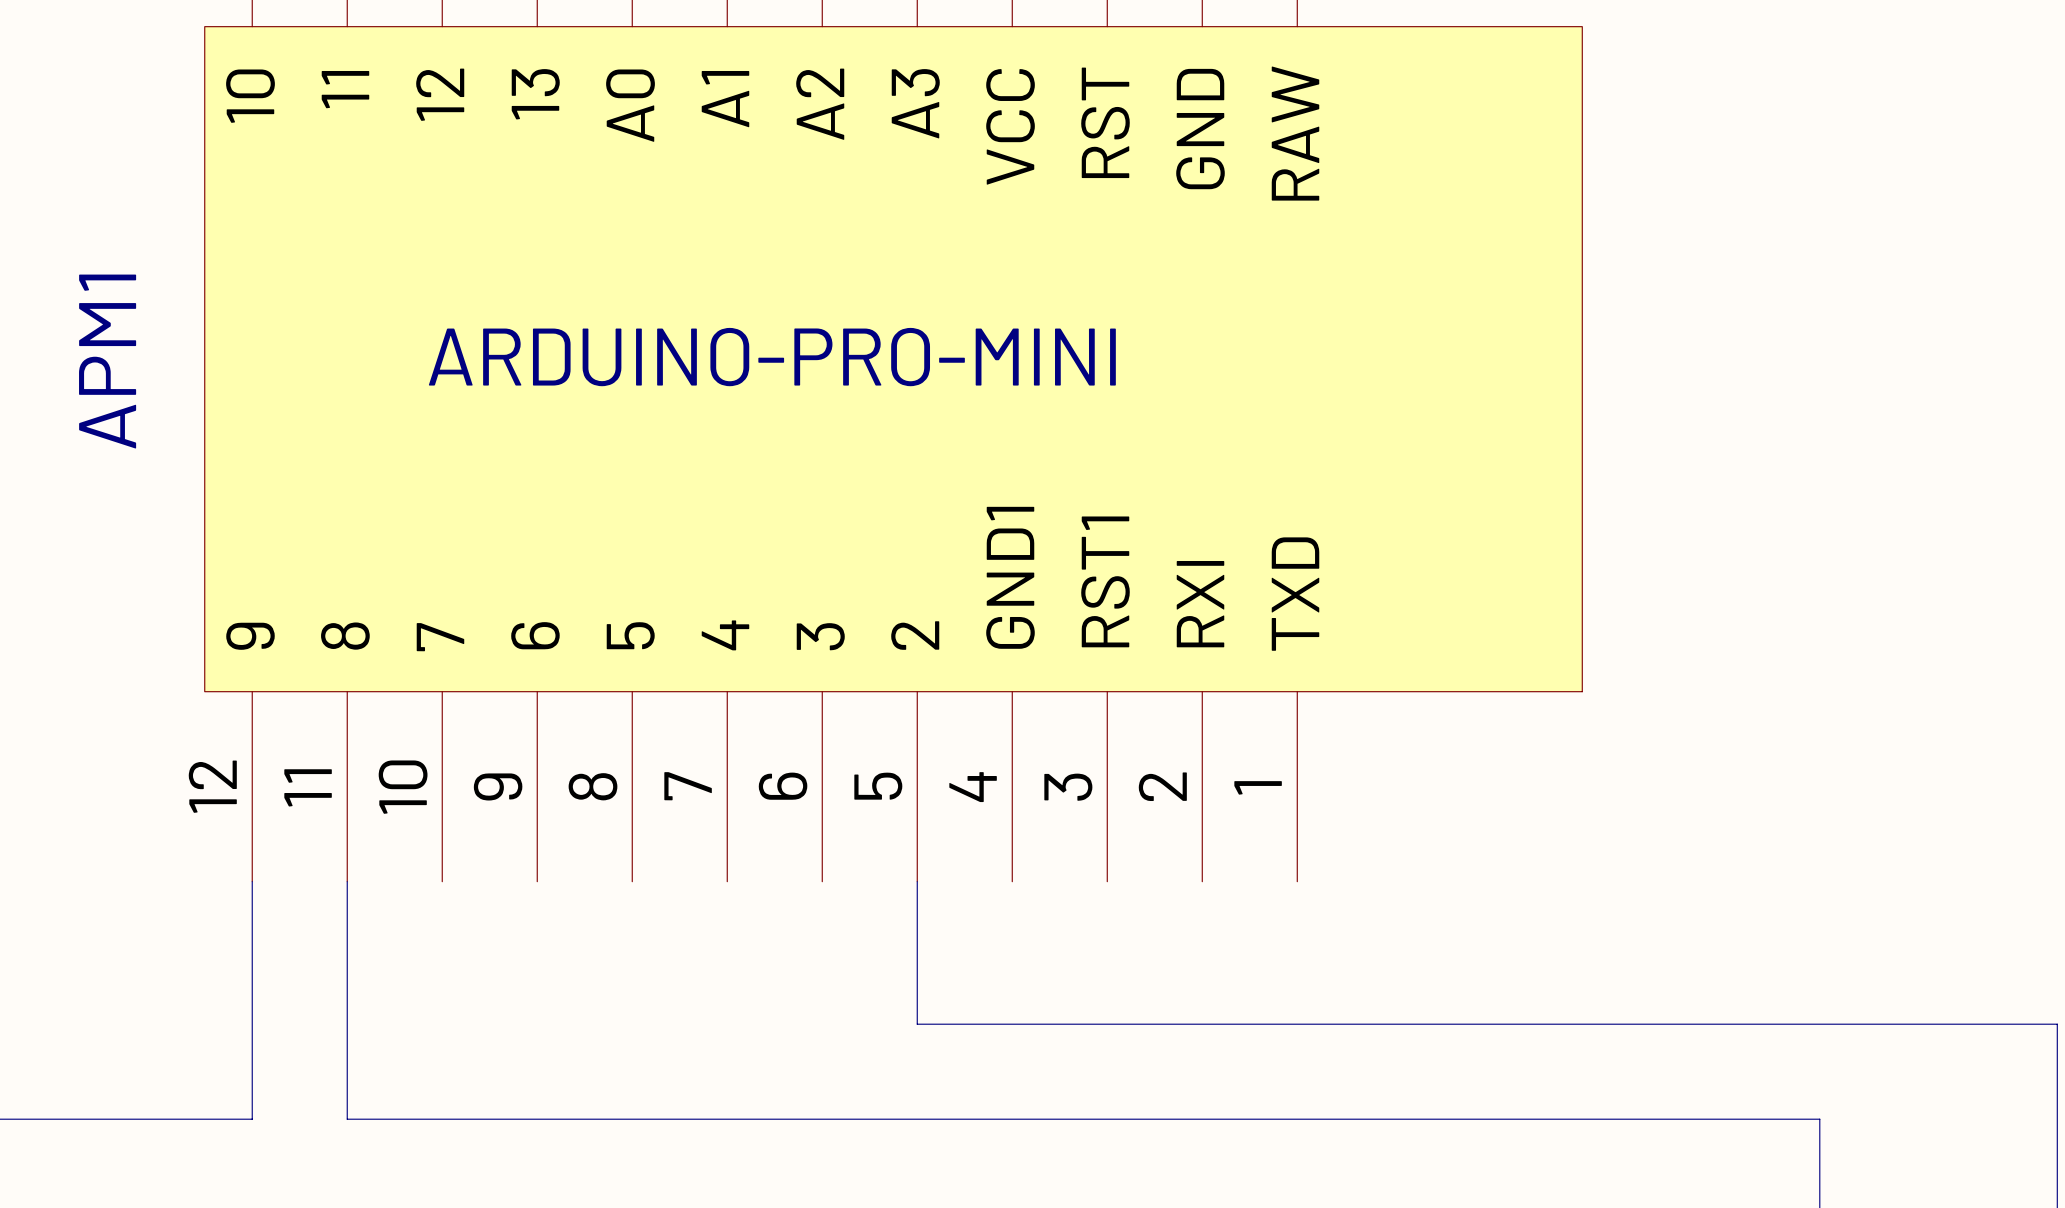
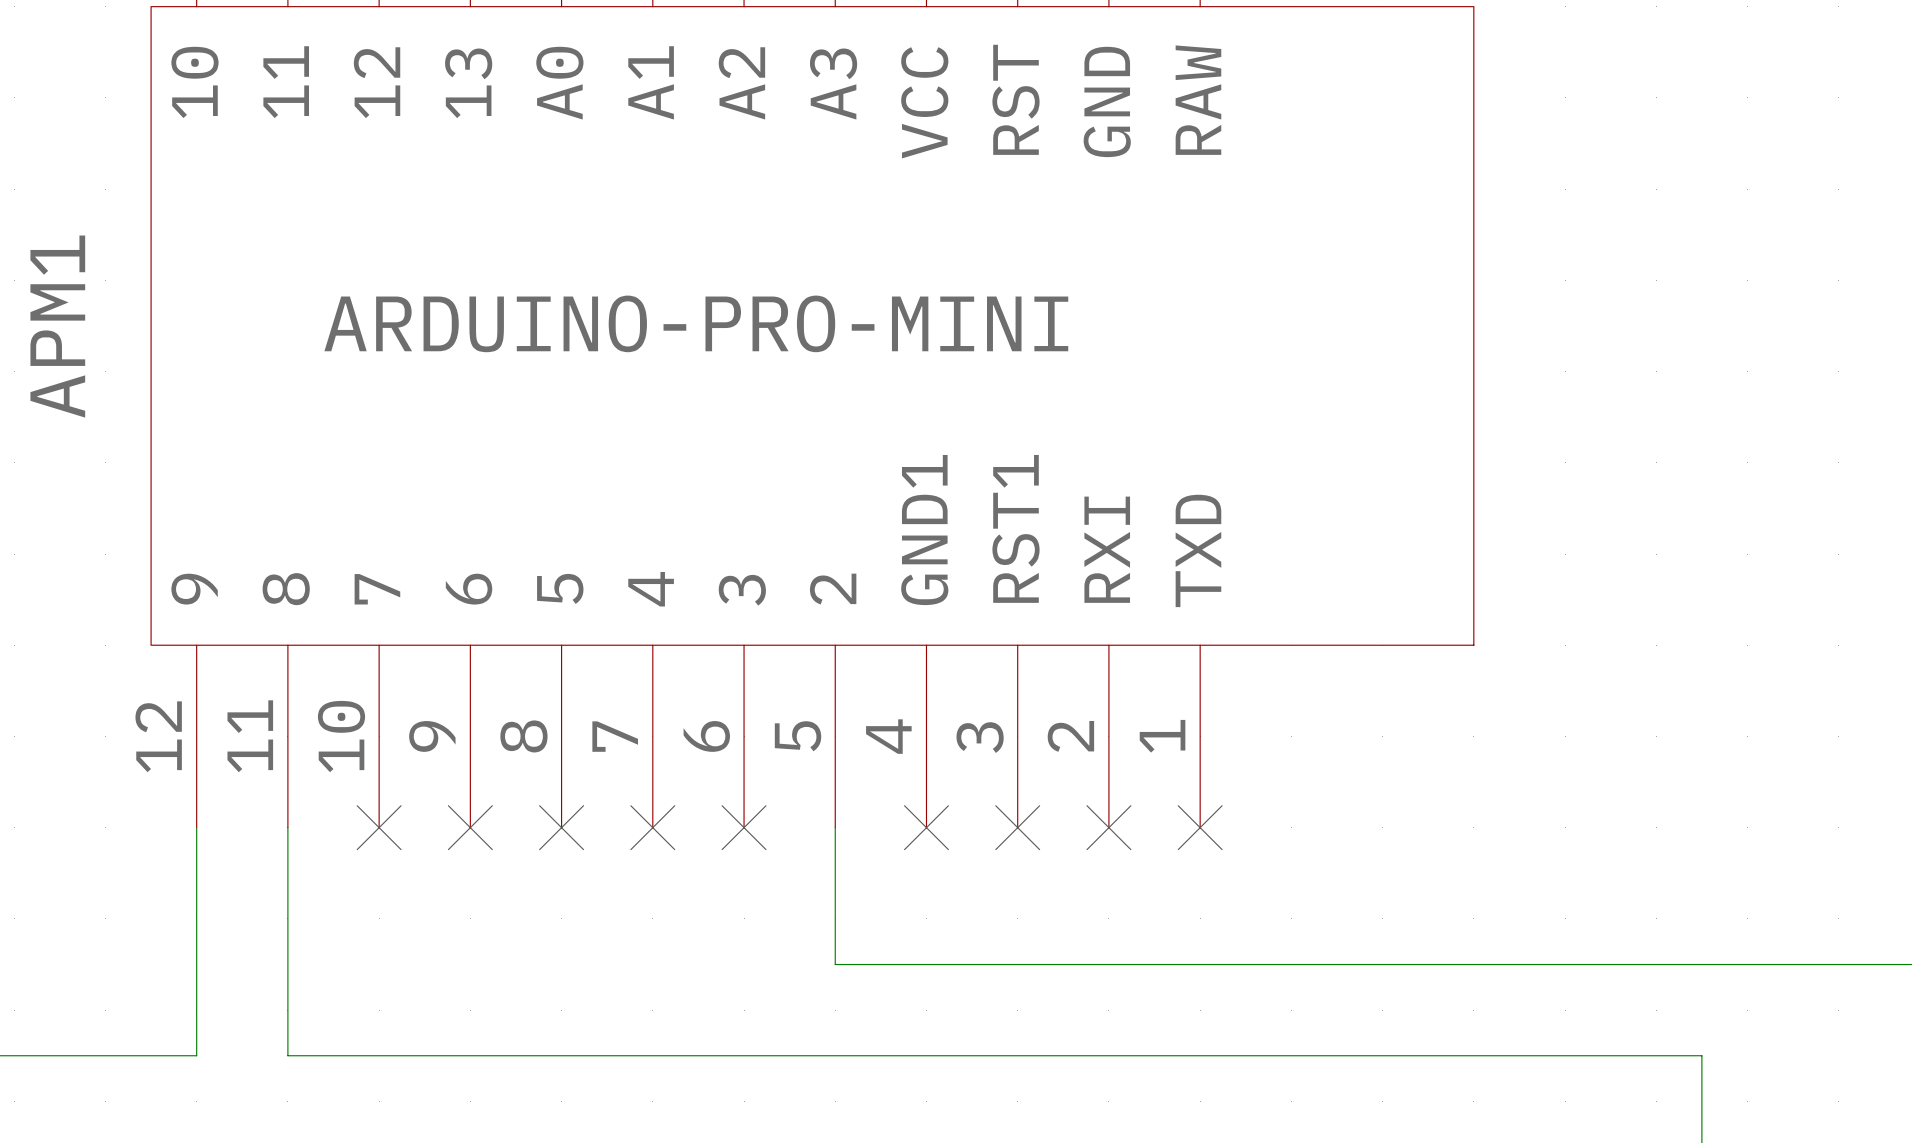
no-connect mark: none -> (379, 827)
no-connect mark: none -> (470, 827)
no-connect mark: none -> (561, 827)
no-connect mark: none -> (652, 827)
no-connect mark: none -> (744, 827)
no-connect mark: none -> (926, 827)
no-connect mark: none -> (1017, 827)
no-connect mark: none -> (1108, 827)
no-connect mark: none -> (1200, 827)

